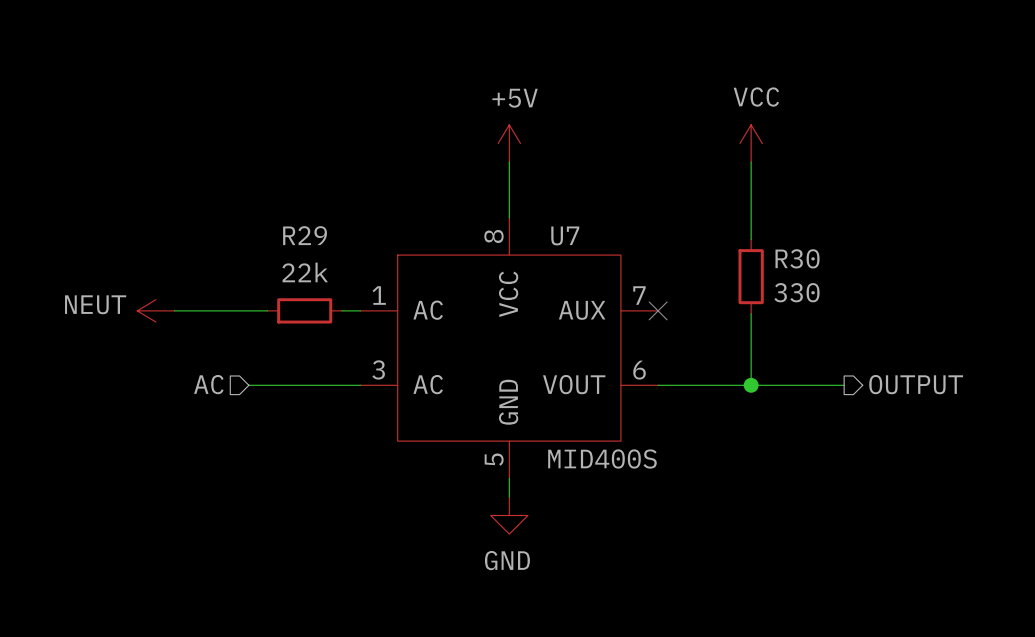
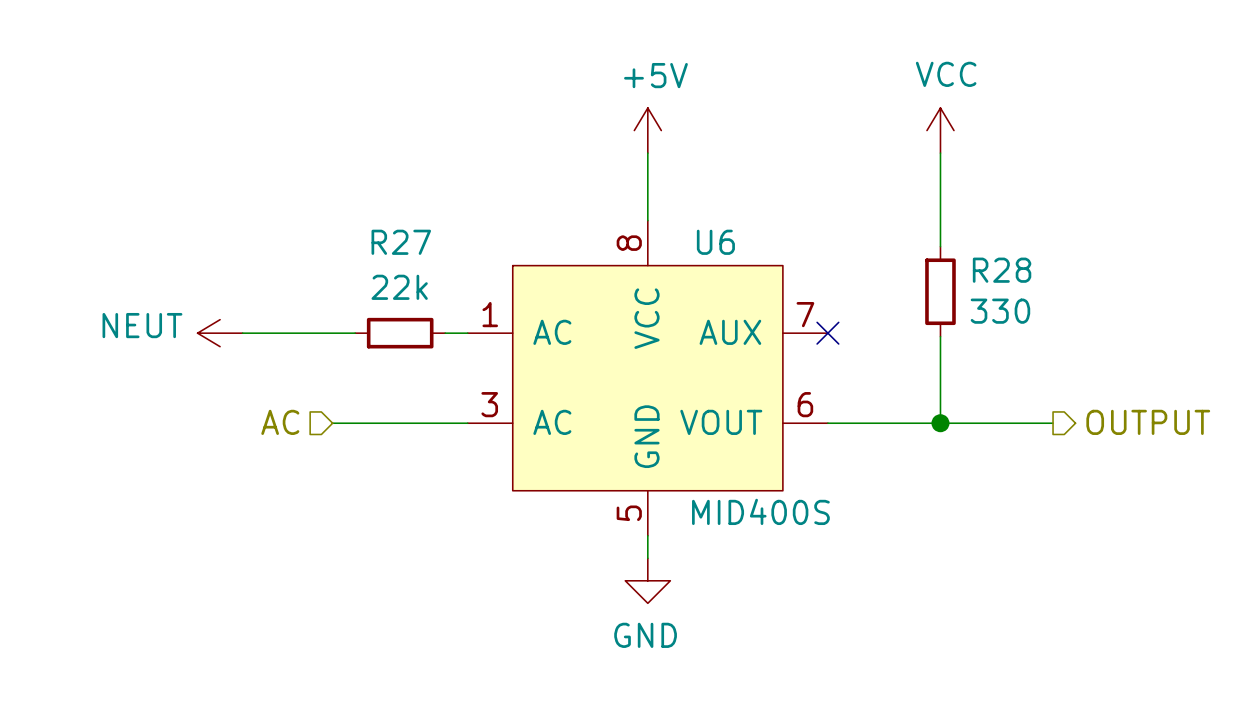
R29 name: R29 (305, 235) -> R27 (401, 242)
U7 name: U7 (565, 235) -> U6 (715, 242)
R30 name: R30 (797, 258) -> R28 (1002, 270)

